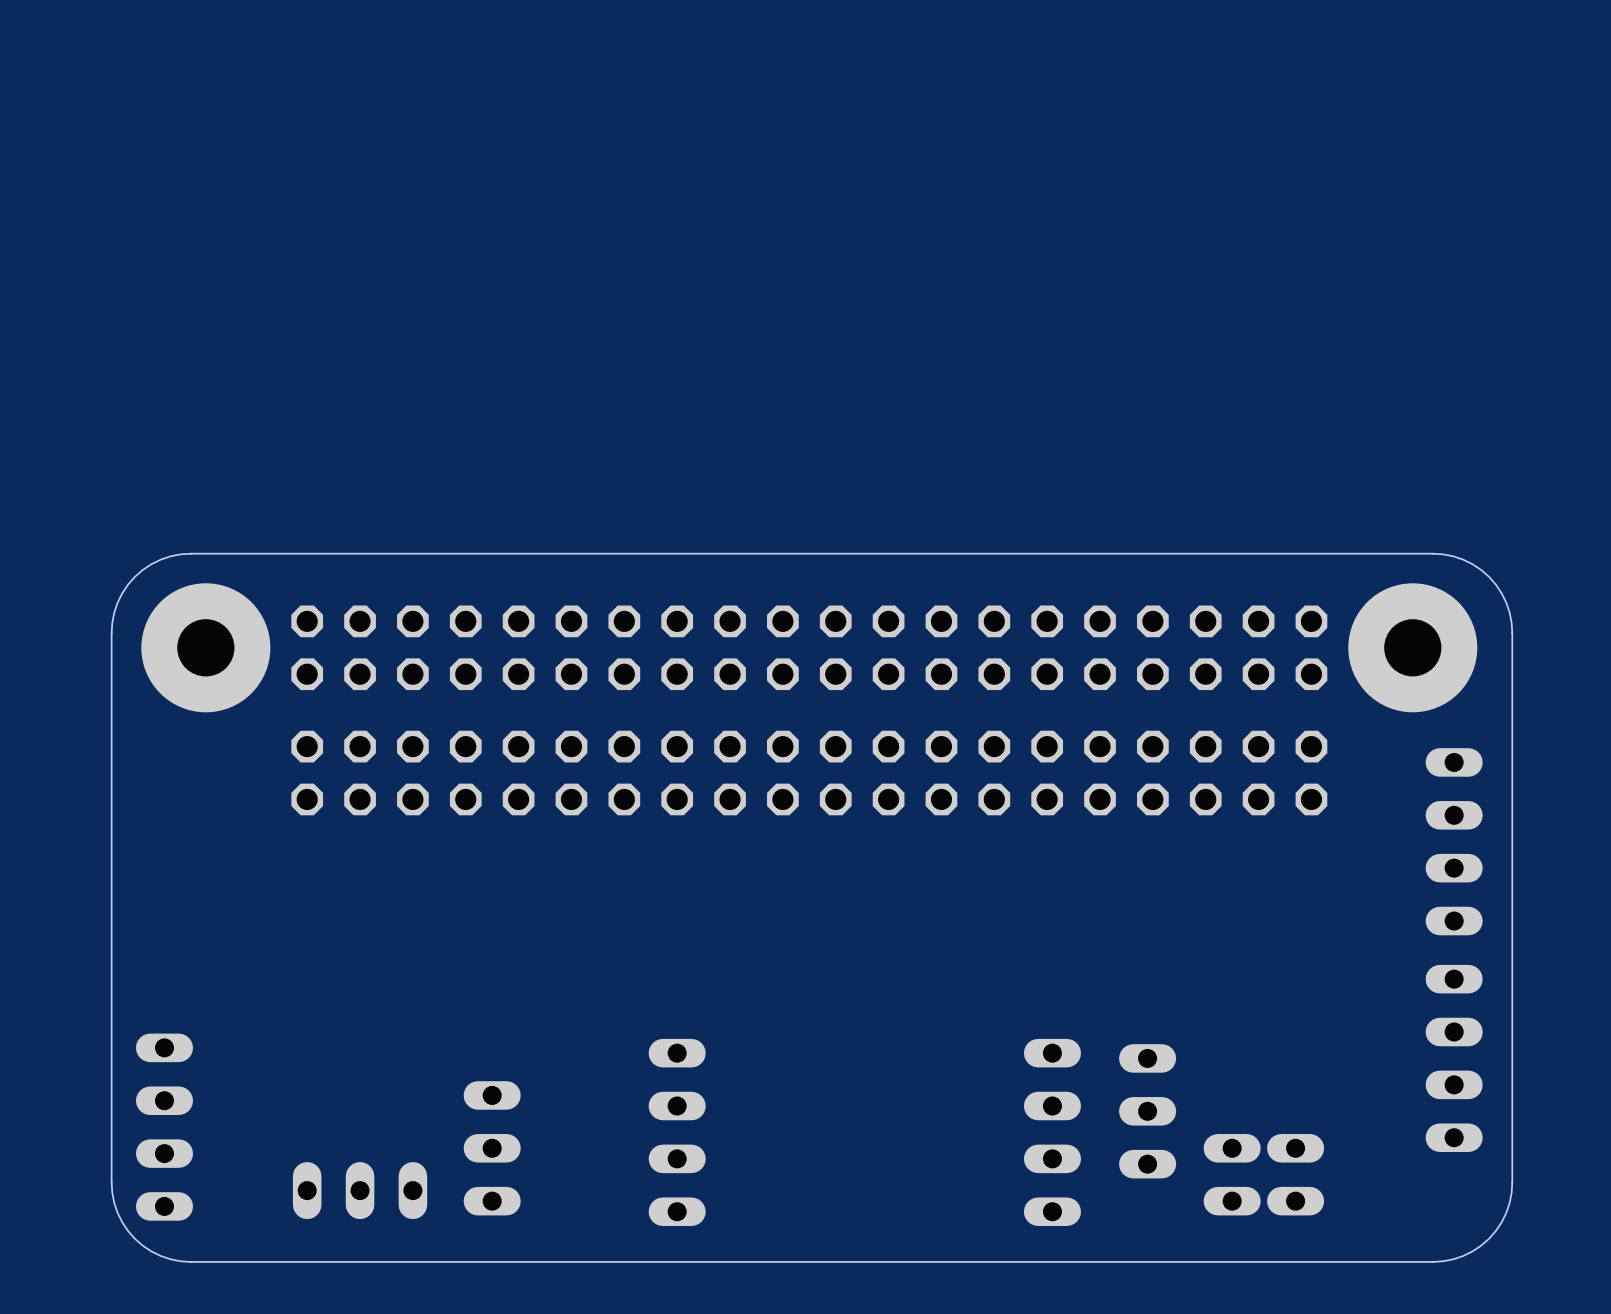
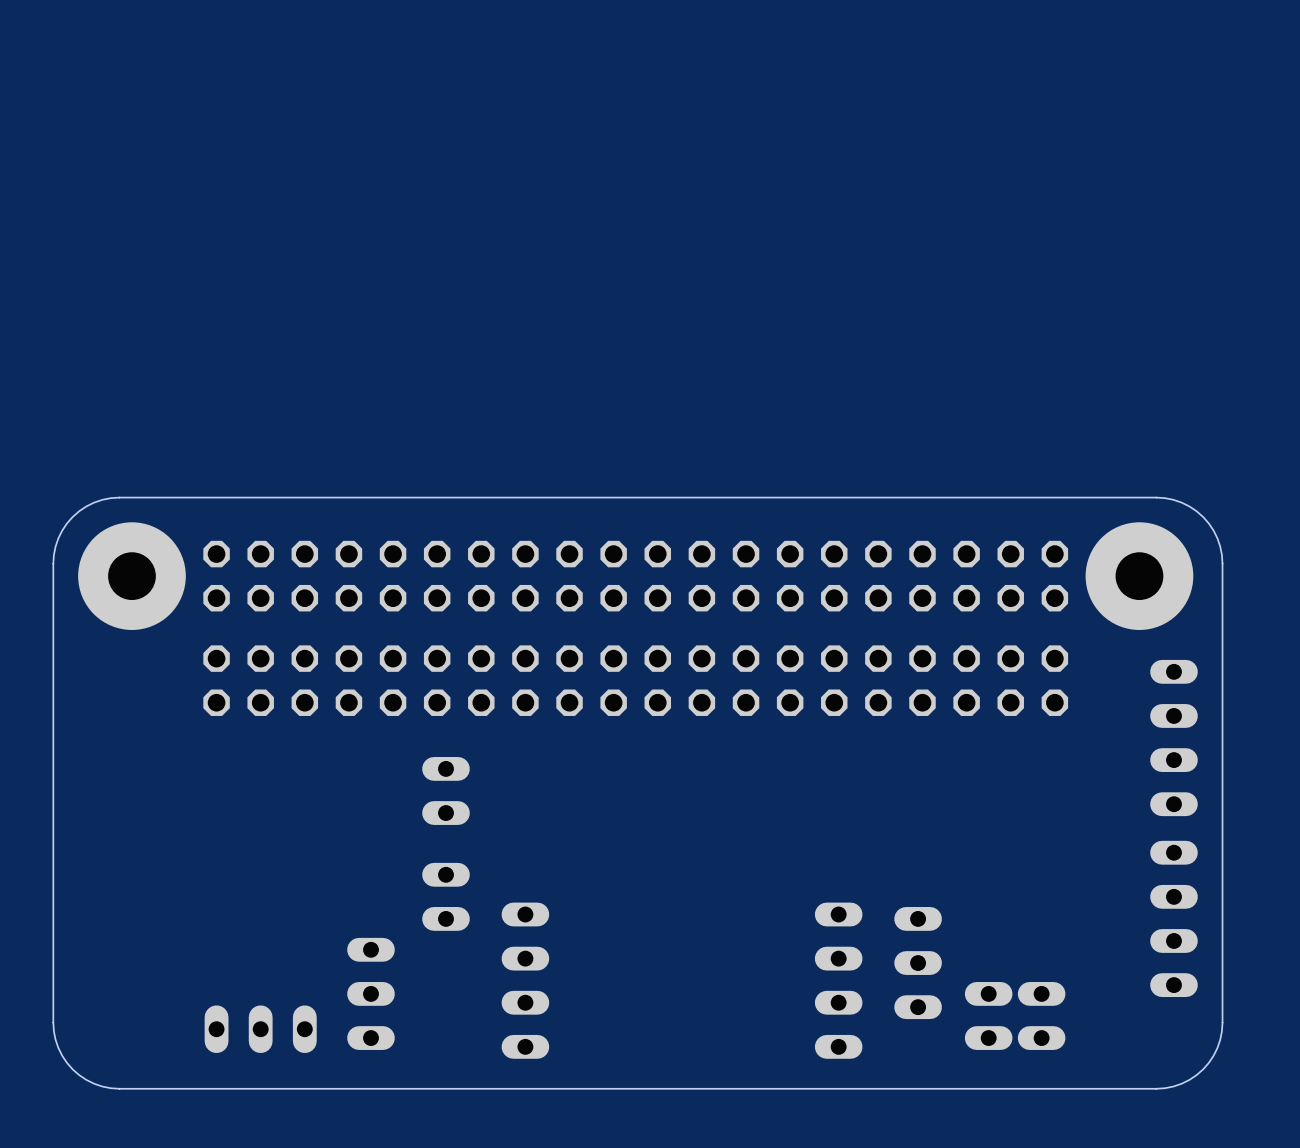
part: none -> (446, 790)
part: none -> (446, 896)
part: (164, 1074) -> none
part: (164, 1180) -> none

